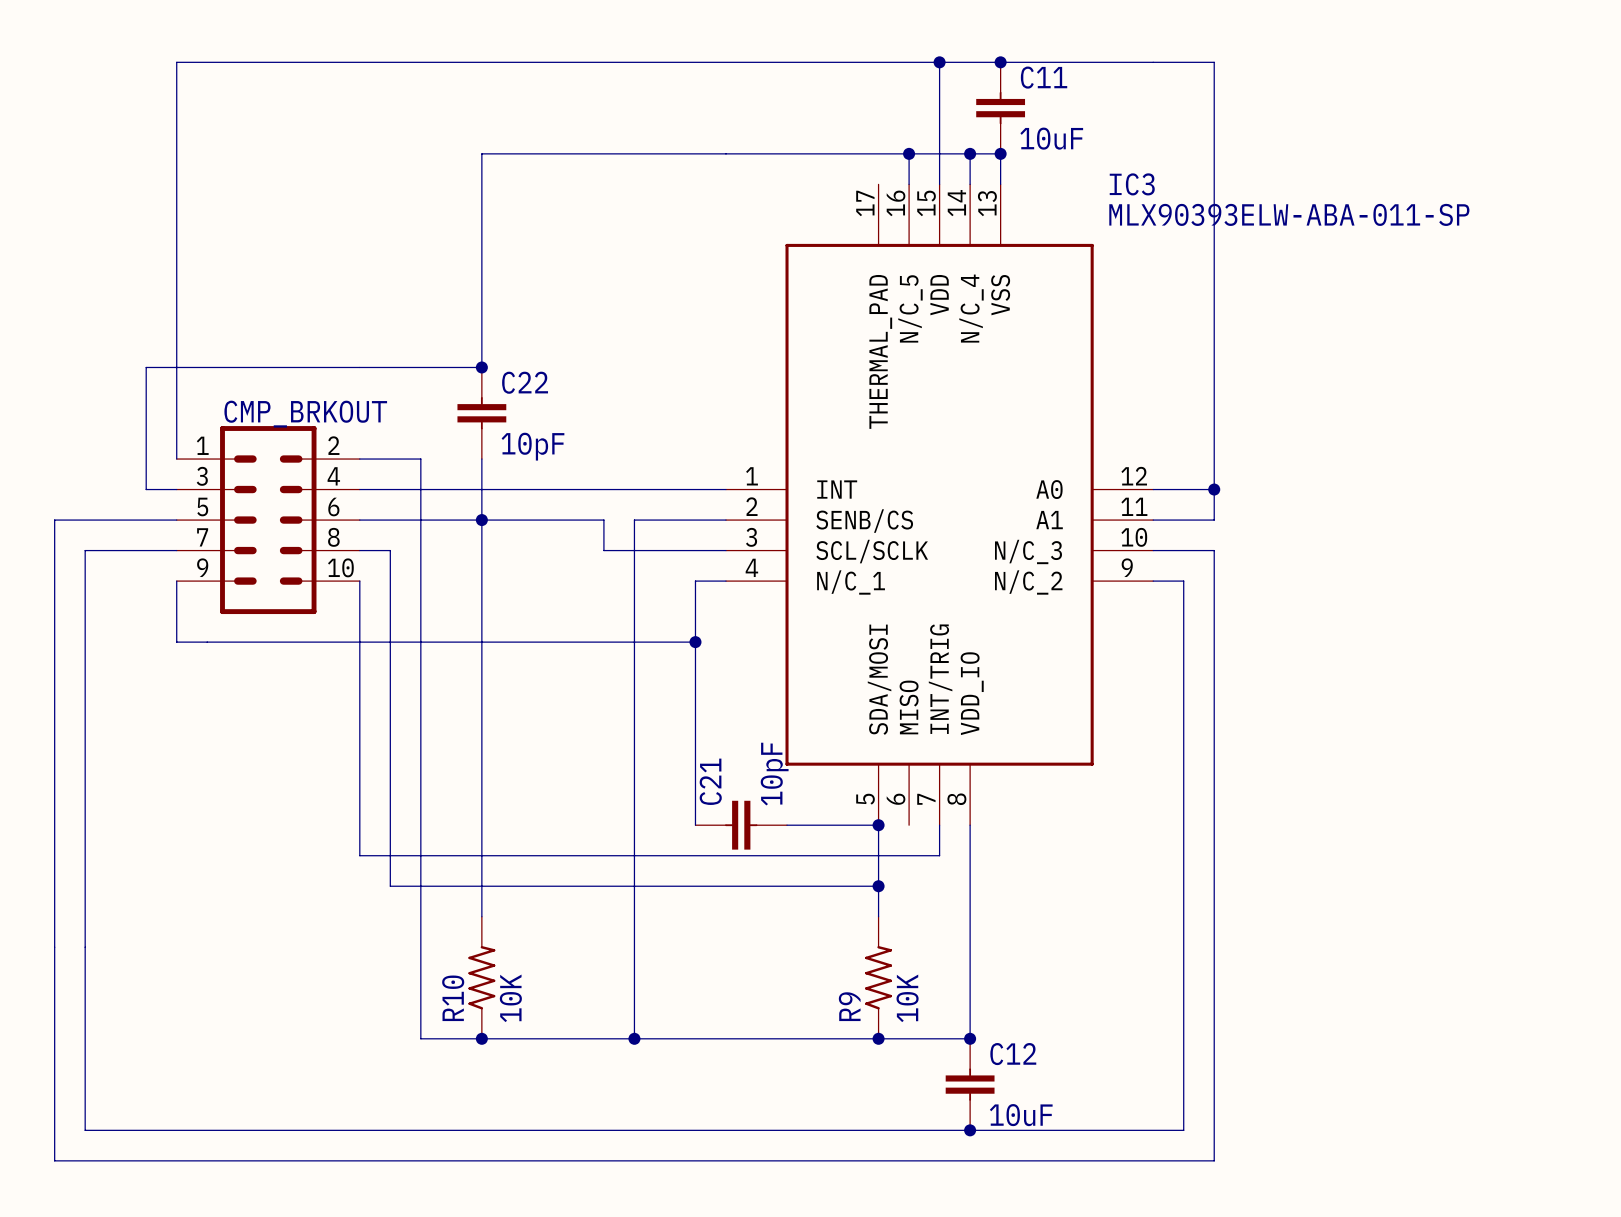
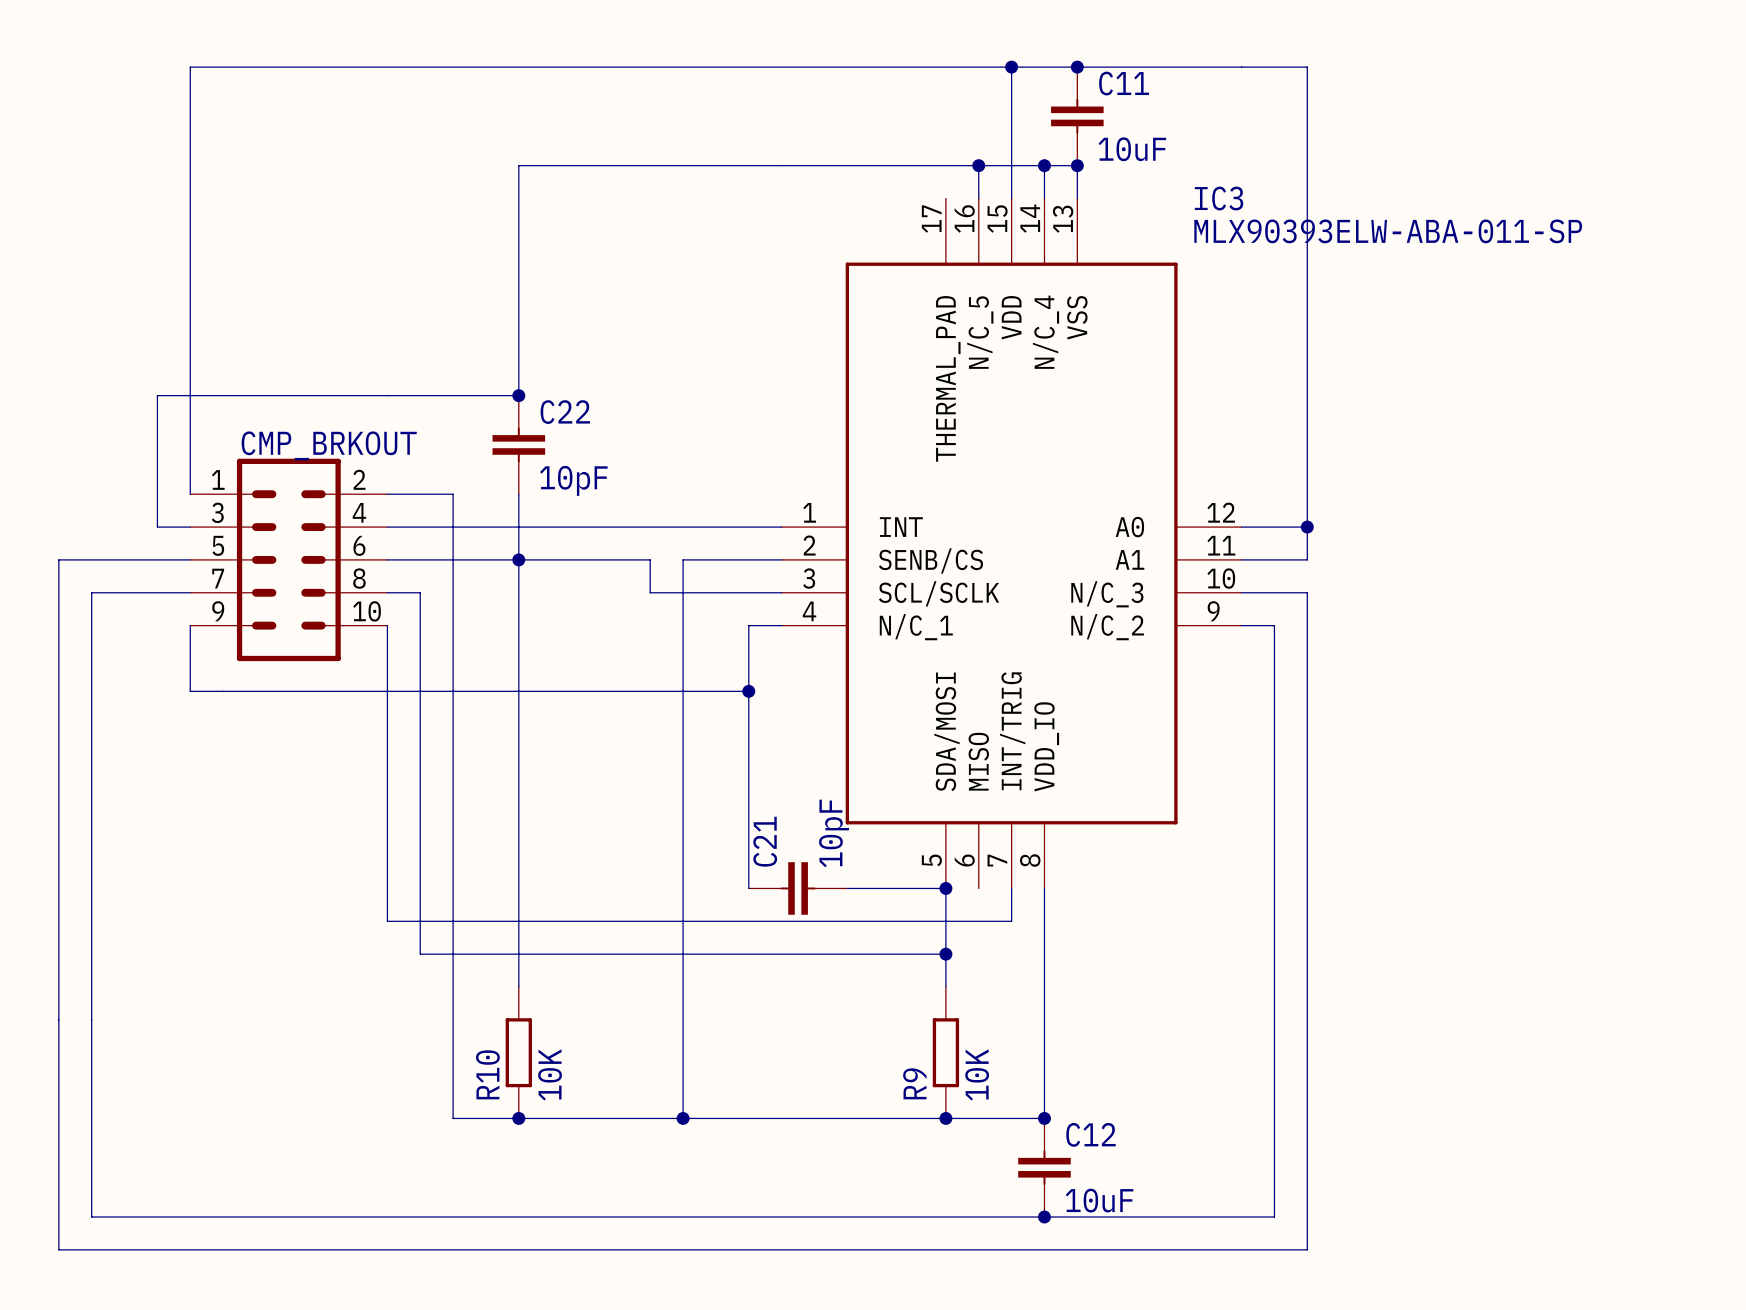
R10 symbol: [468, 916, 496, 1039] -> [505, 987, 532, 1119]
R9 symbol: [865, 916, 892, 1039] -> [932, 987, 960, 1119]

